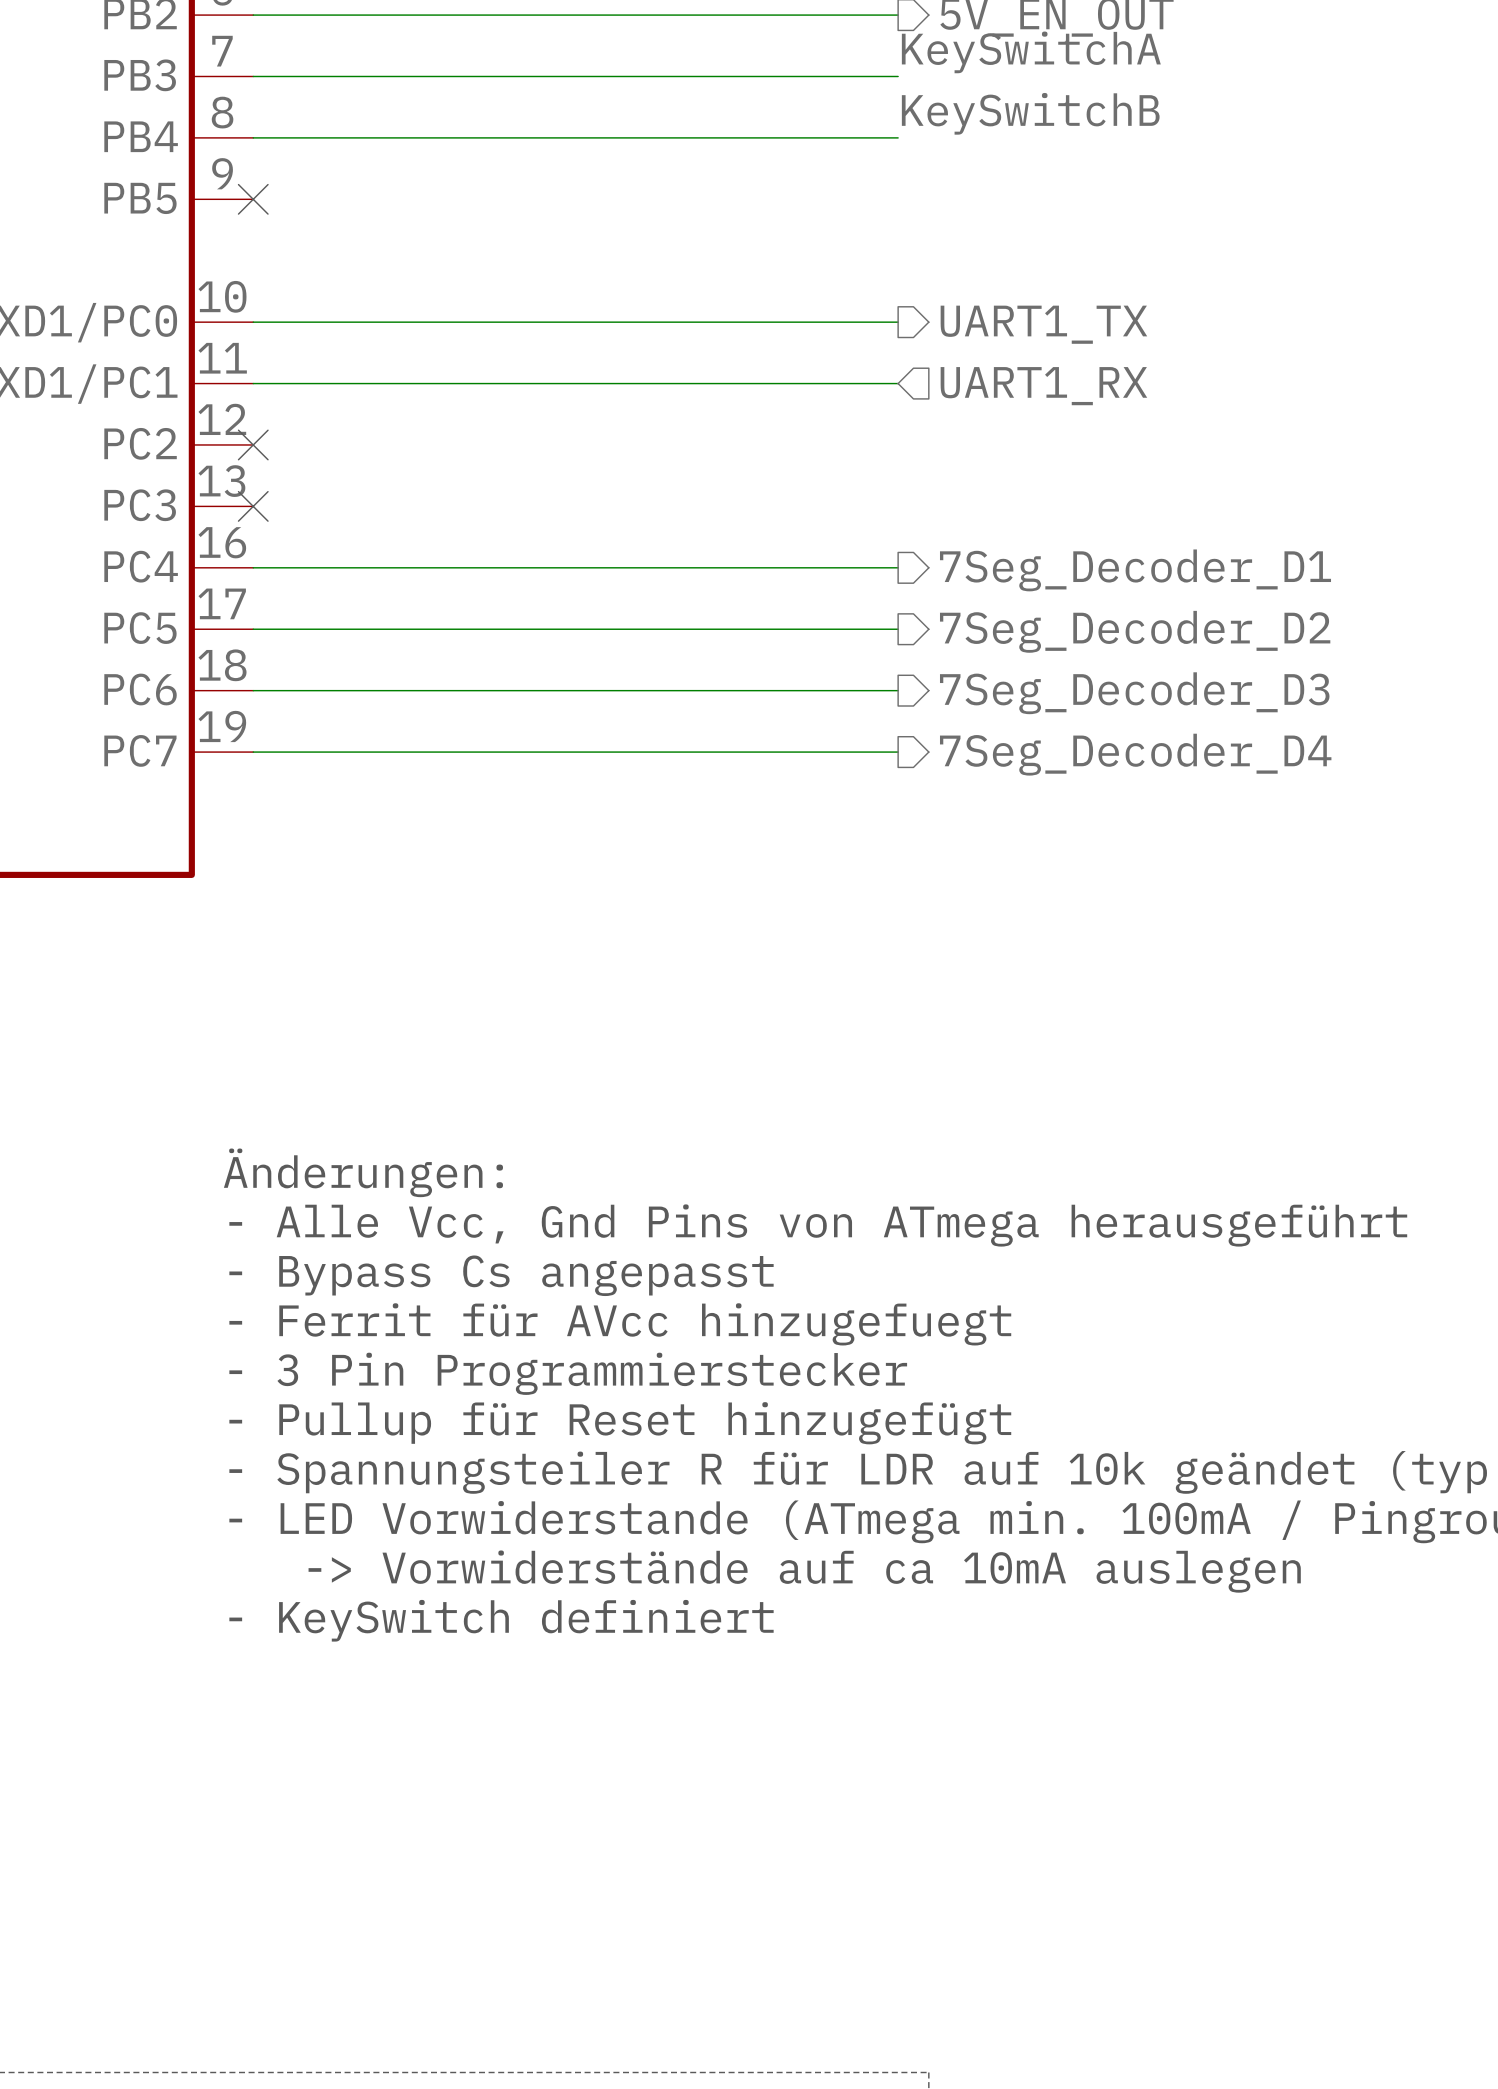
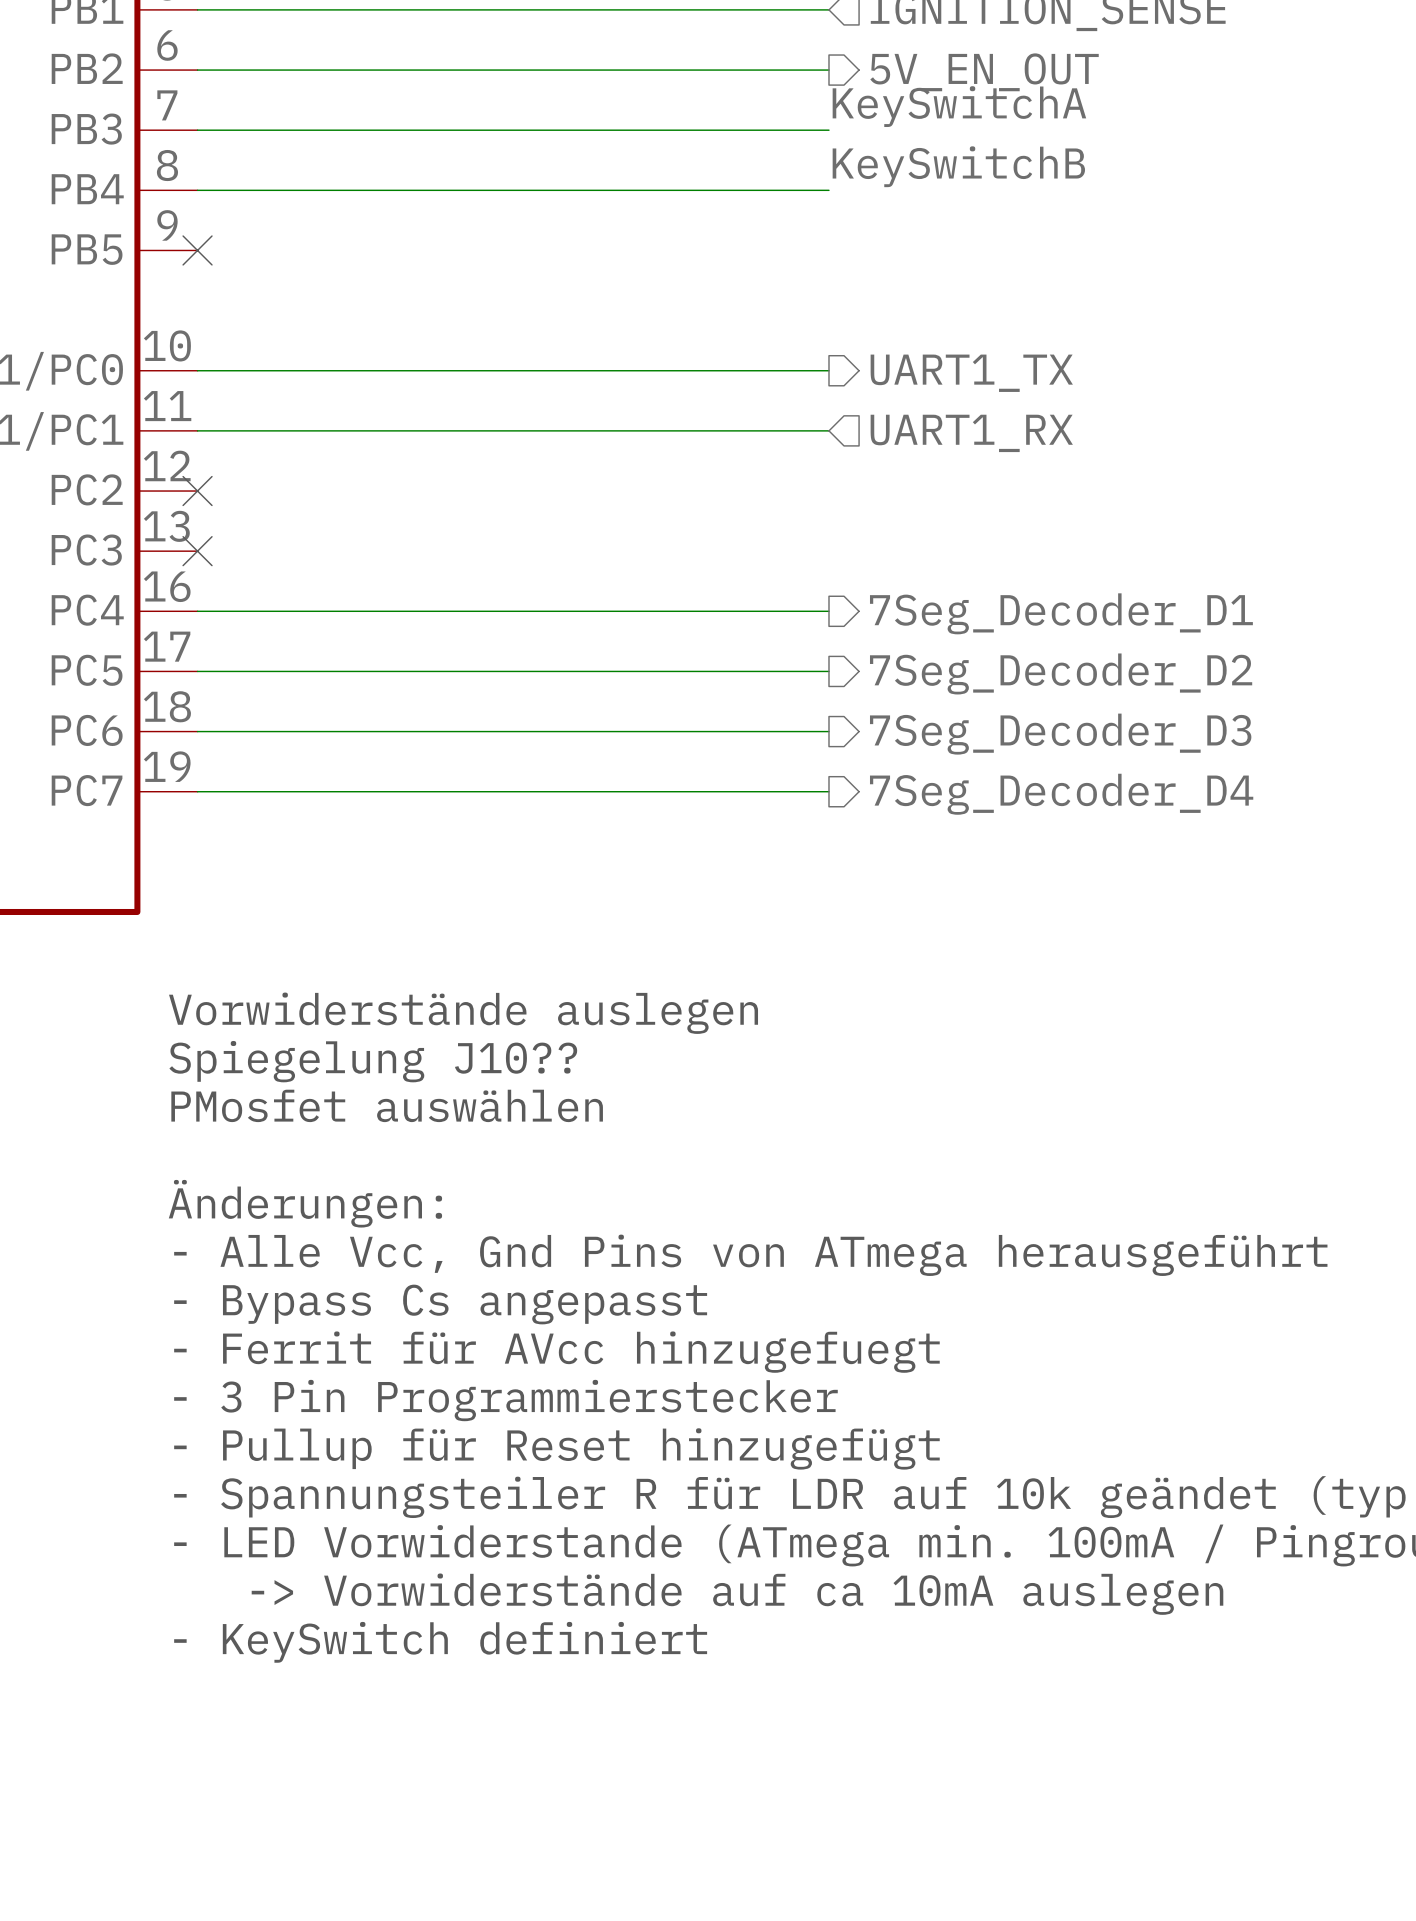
text: none -> Vorwiderstände auslegen (463, 1013)
text: none -> Spiegelung J10?? (373, 1061)
text: none -> PMosfet auswählen (387, 1105)

